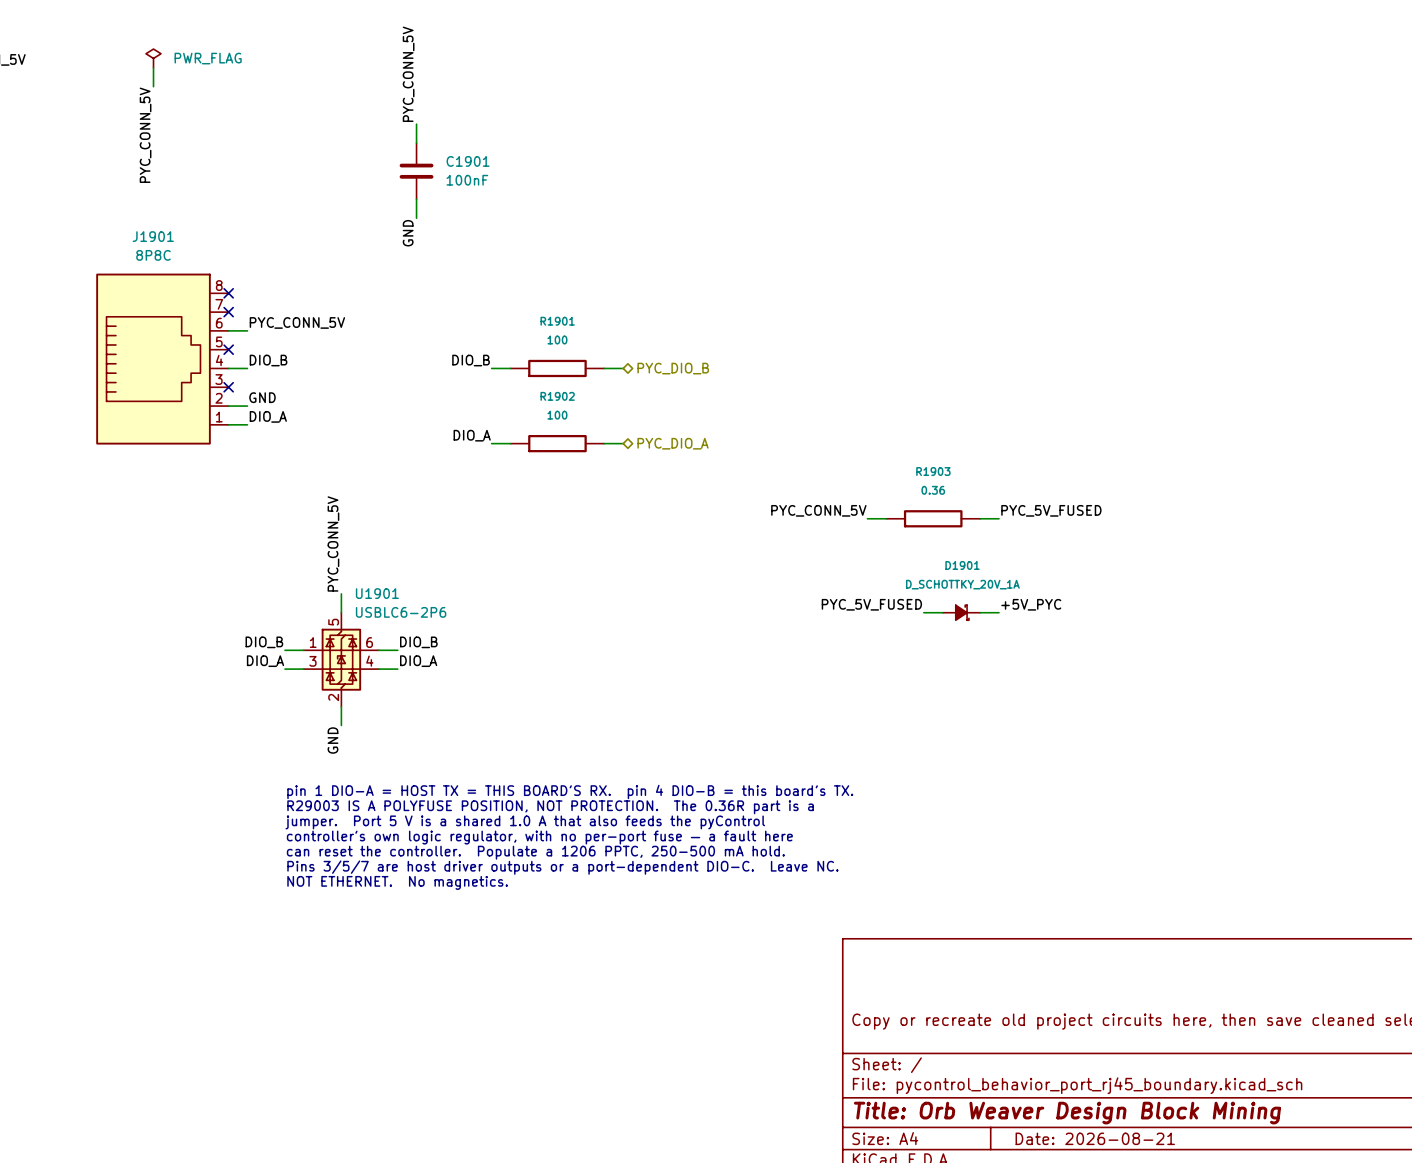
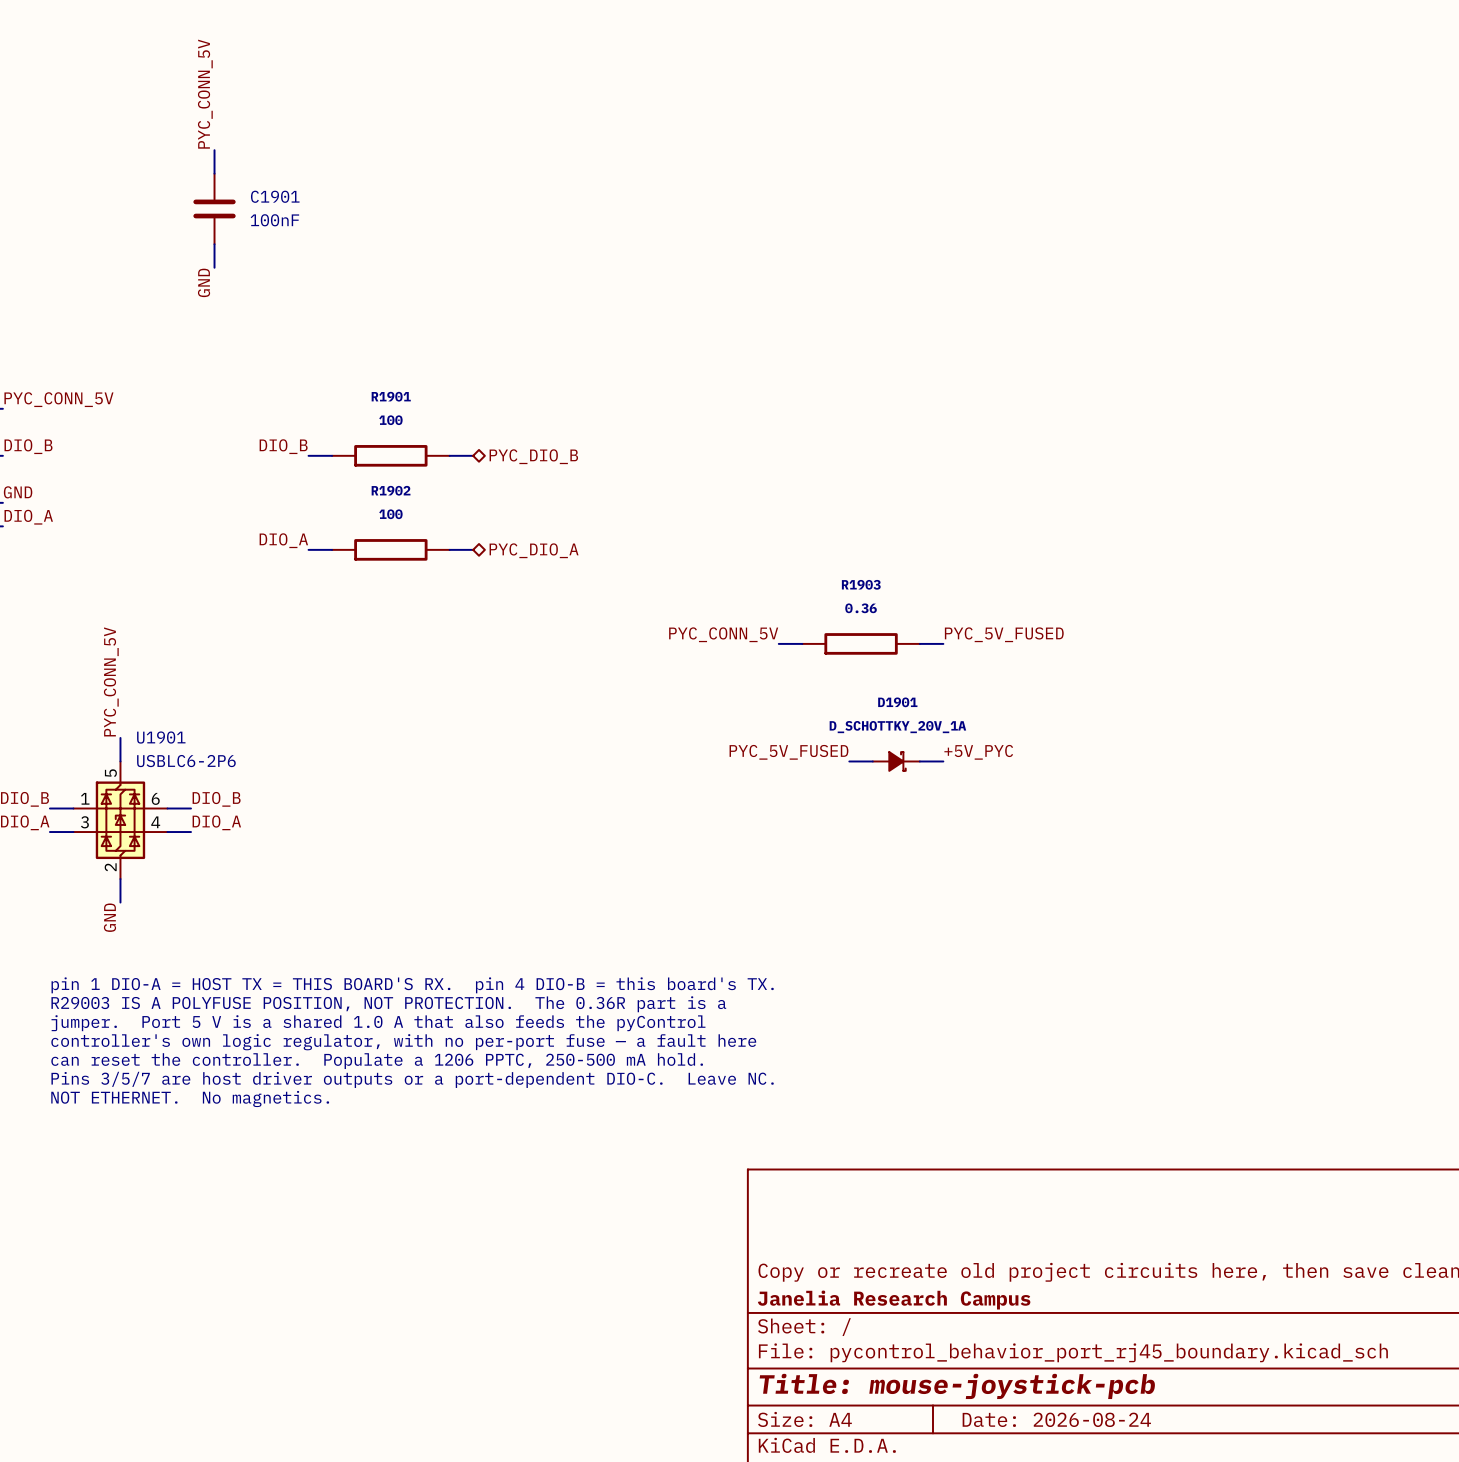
title block: none -> Janelia Research Campus (894, 1300)
title block: Title: Orb Weaver Design Block Mining (1067, 1113) -> Title: mouse-joystick-pcb (957, 1386)
title block: Date: 2026-08-21 (1095, 1138) -> Date: 2026-08-24 (1056, 1419)

